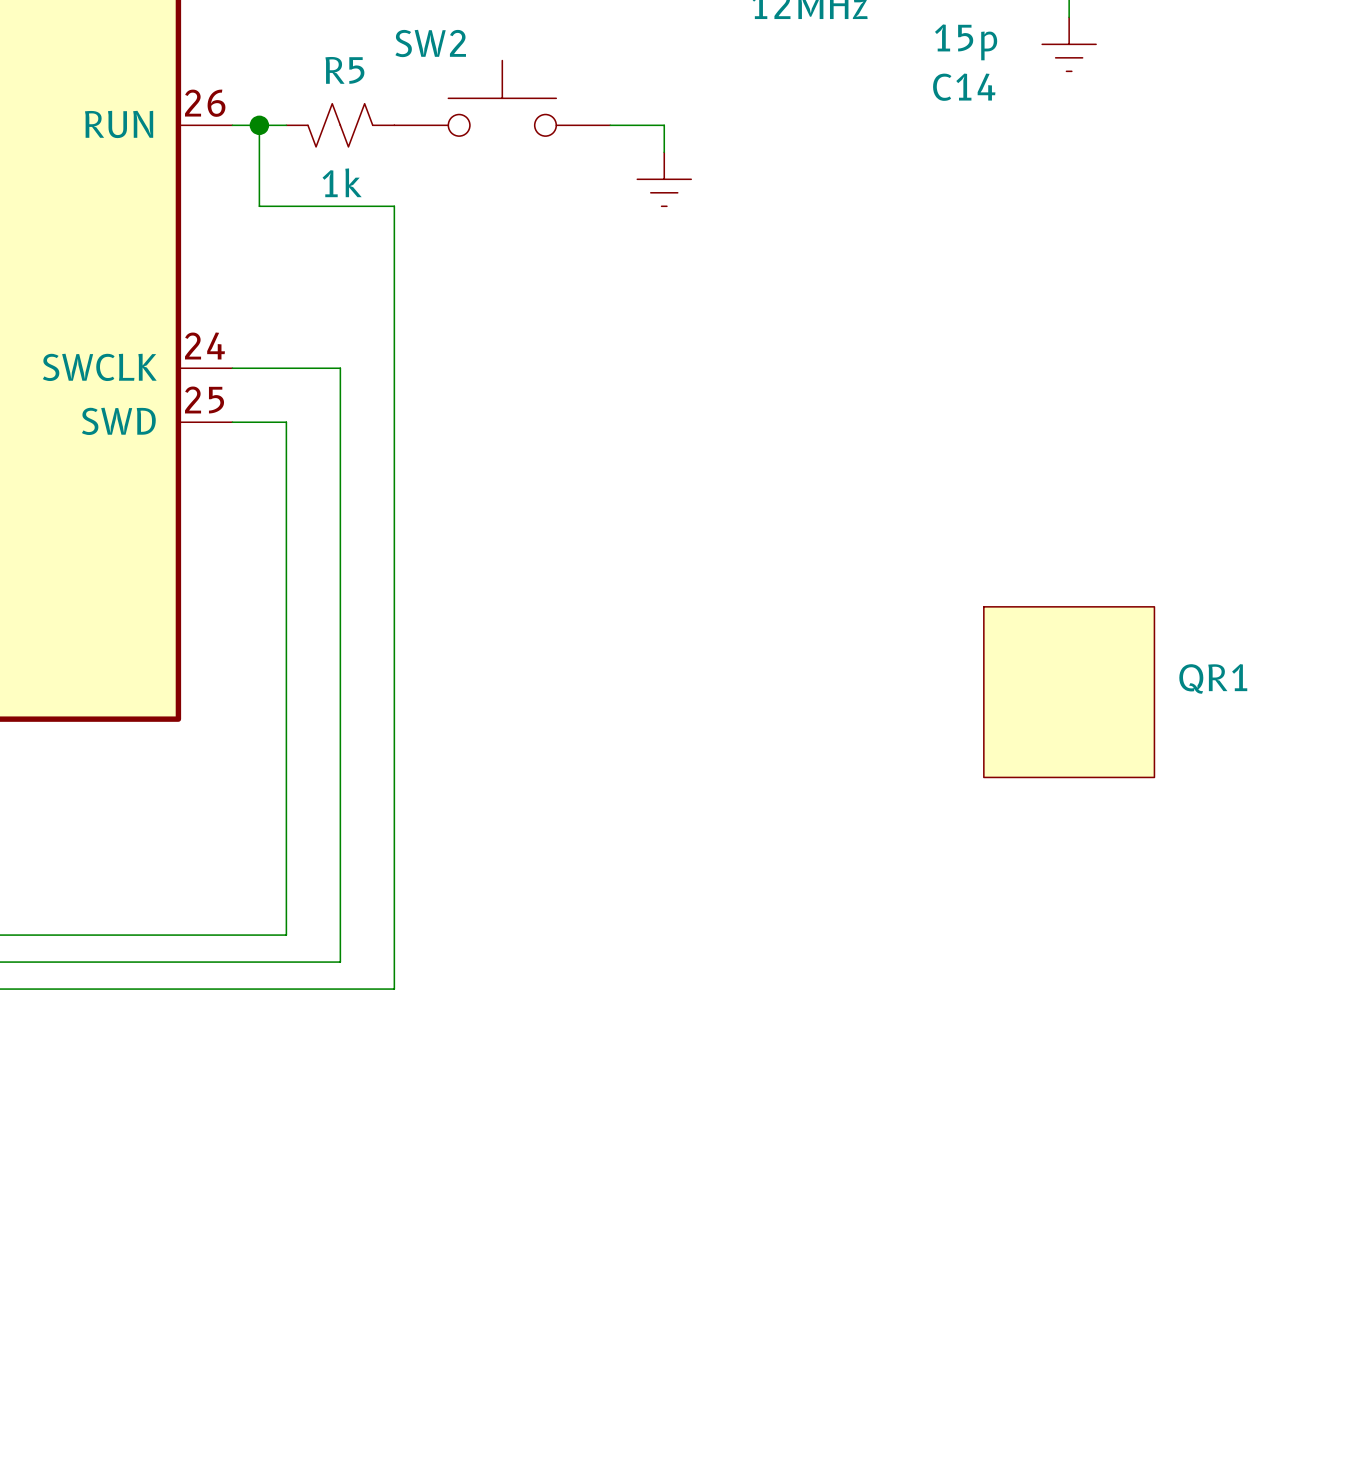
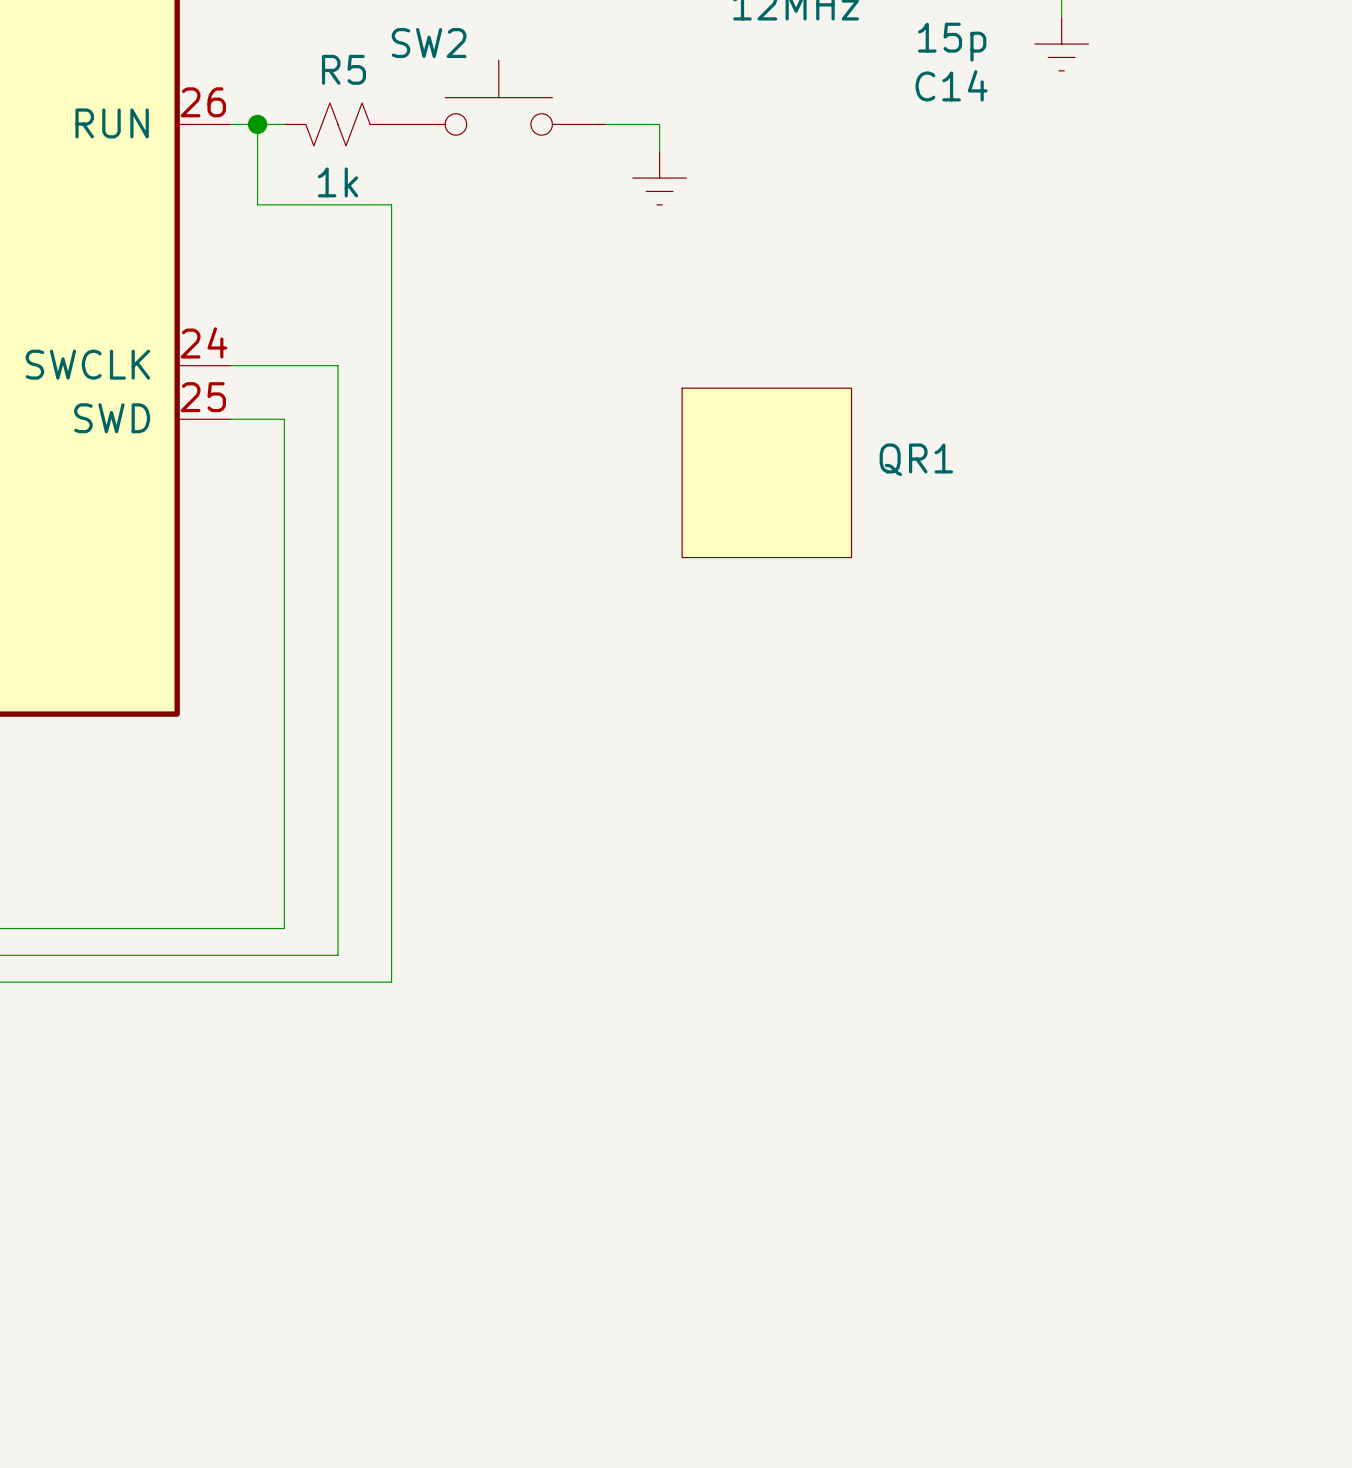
QR1 position: (1069, 692) -> (766, 472)

